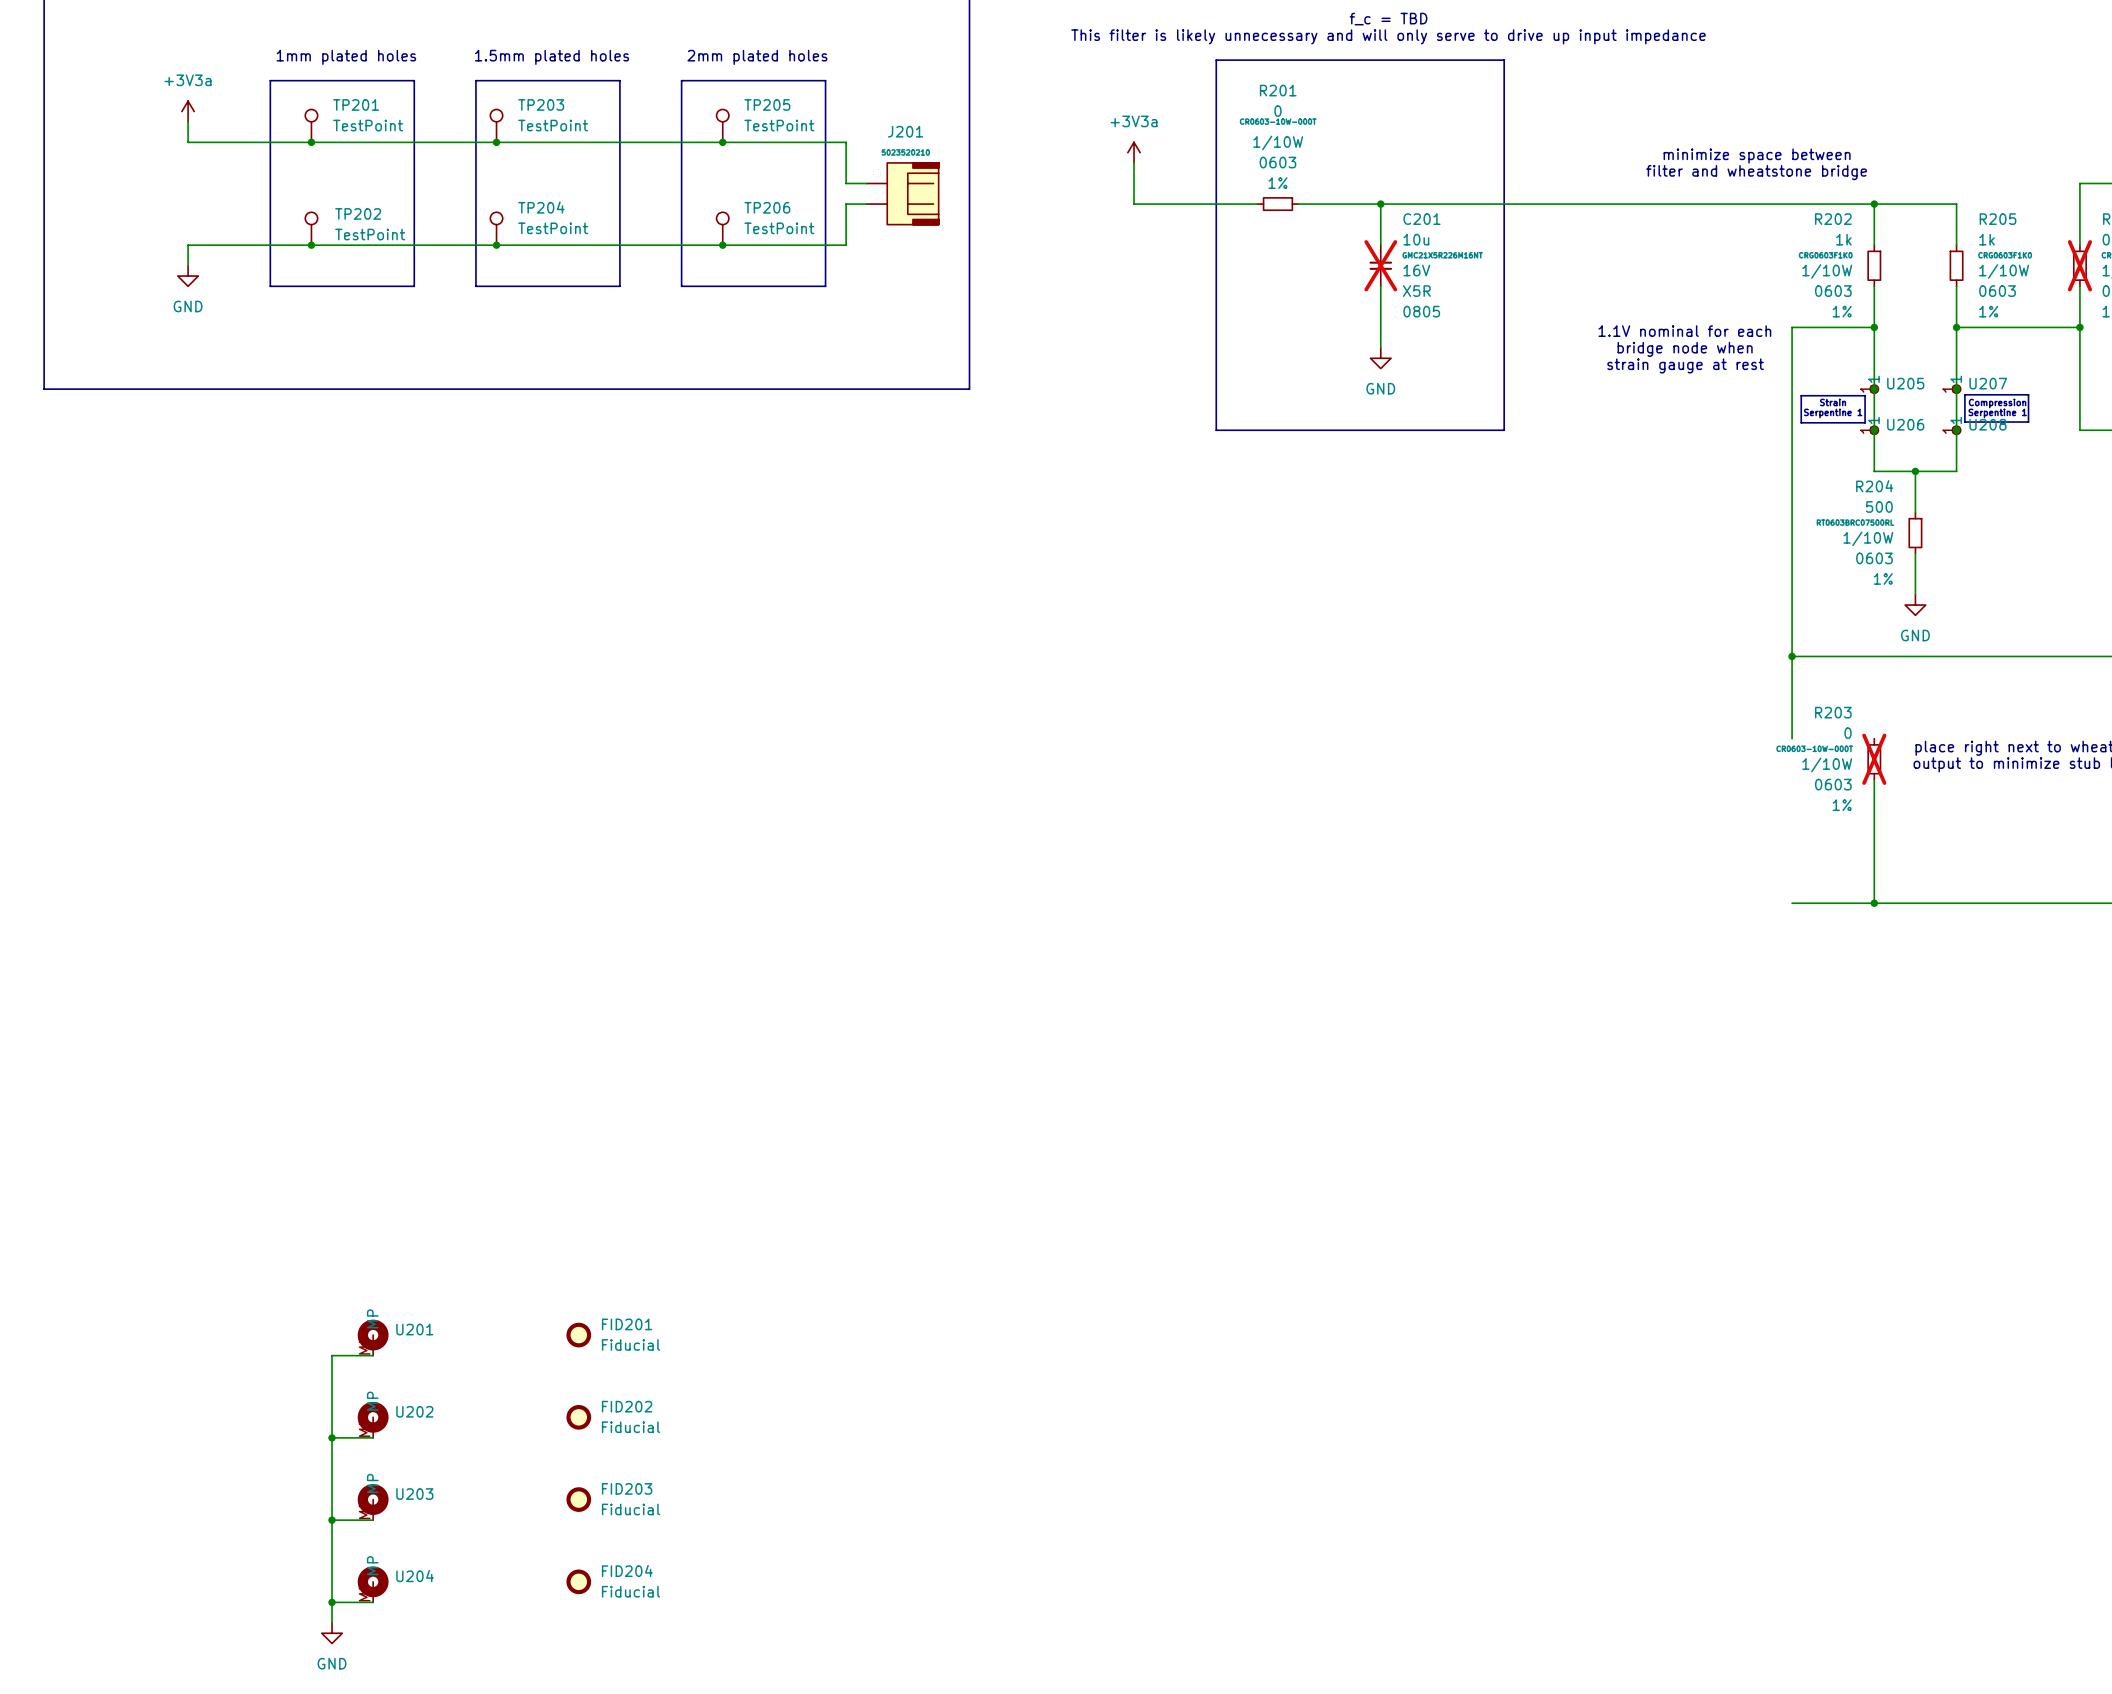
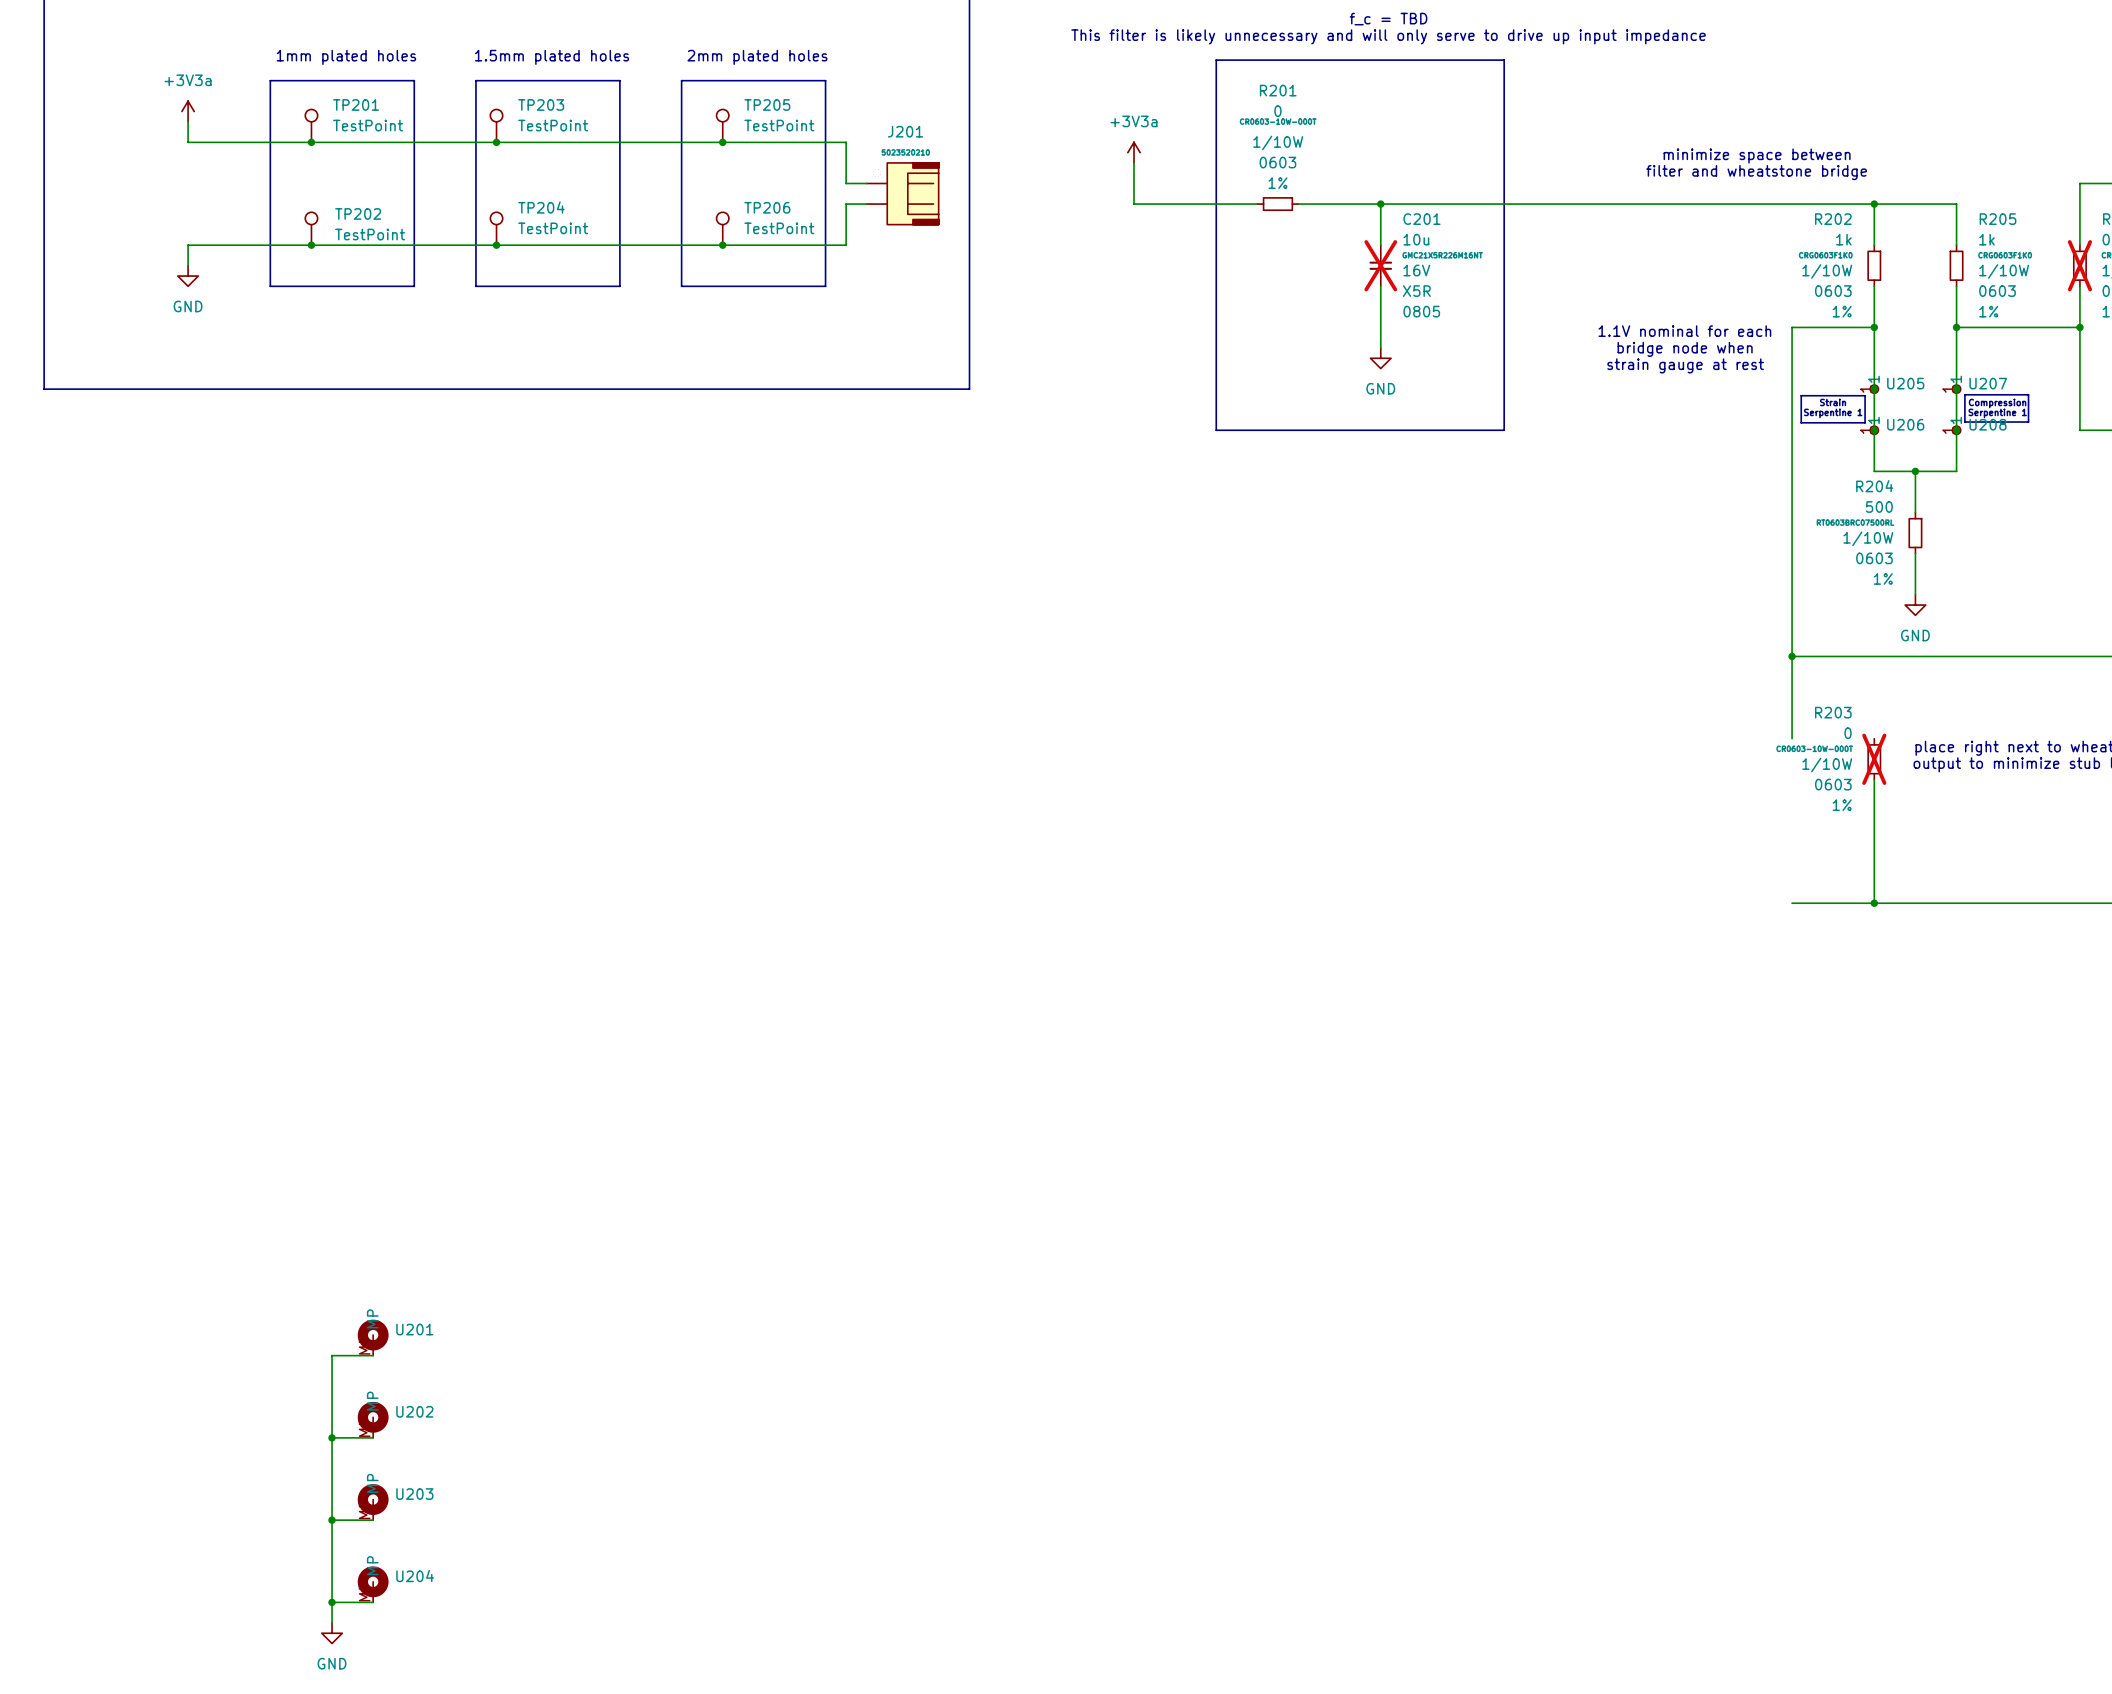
FID201: Fiducial (578, 1335) -> none
FID202: Fiducial (578, 1417) -> none
FID203: Fiducial (578, 1499) -> none
FID204: Fiducial (578, 1581) -> none

